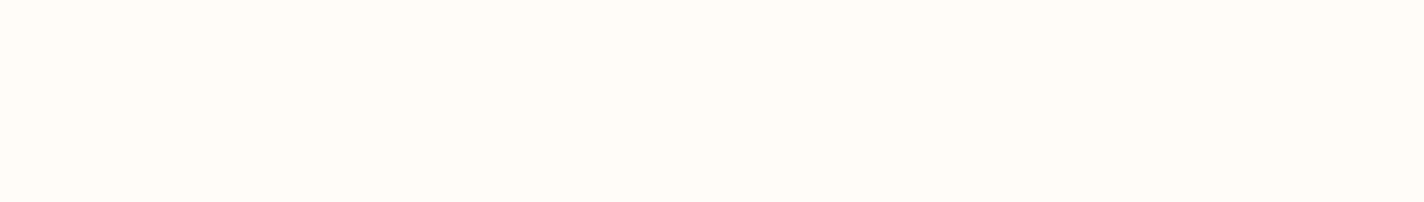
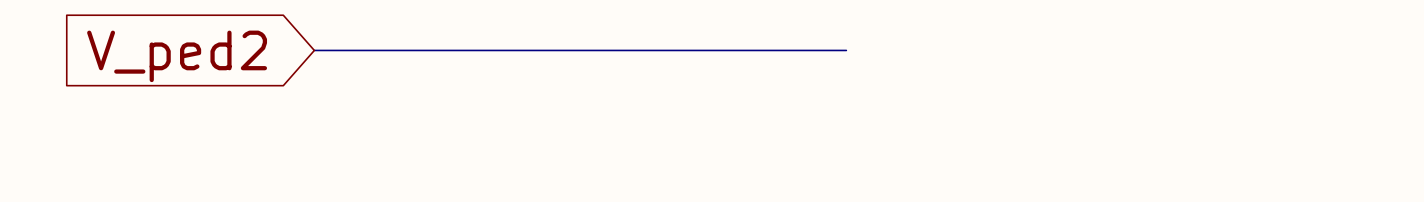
wire: none -> (314, 50) (846, 50)
global label: none -> V_ped2 (177, 56)

